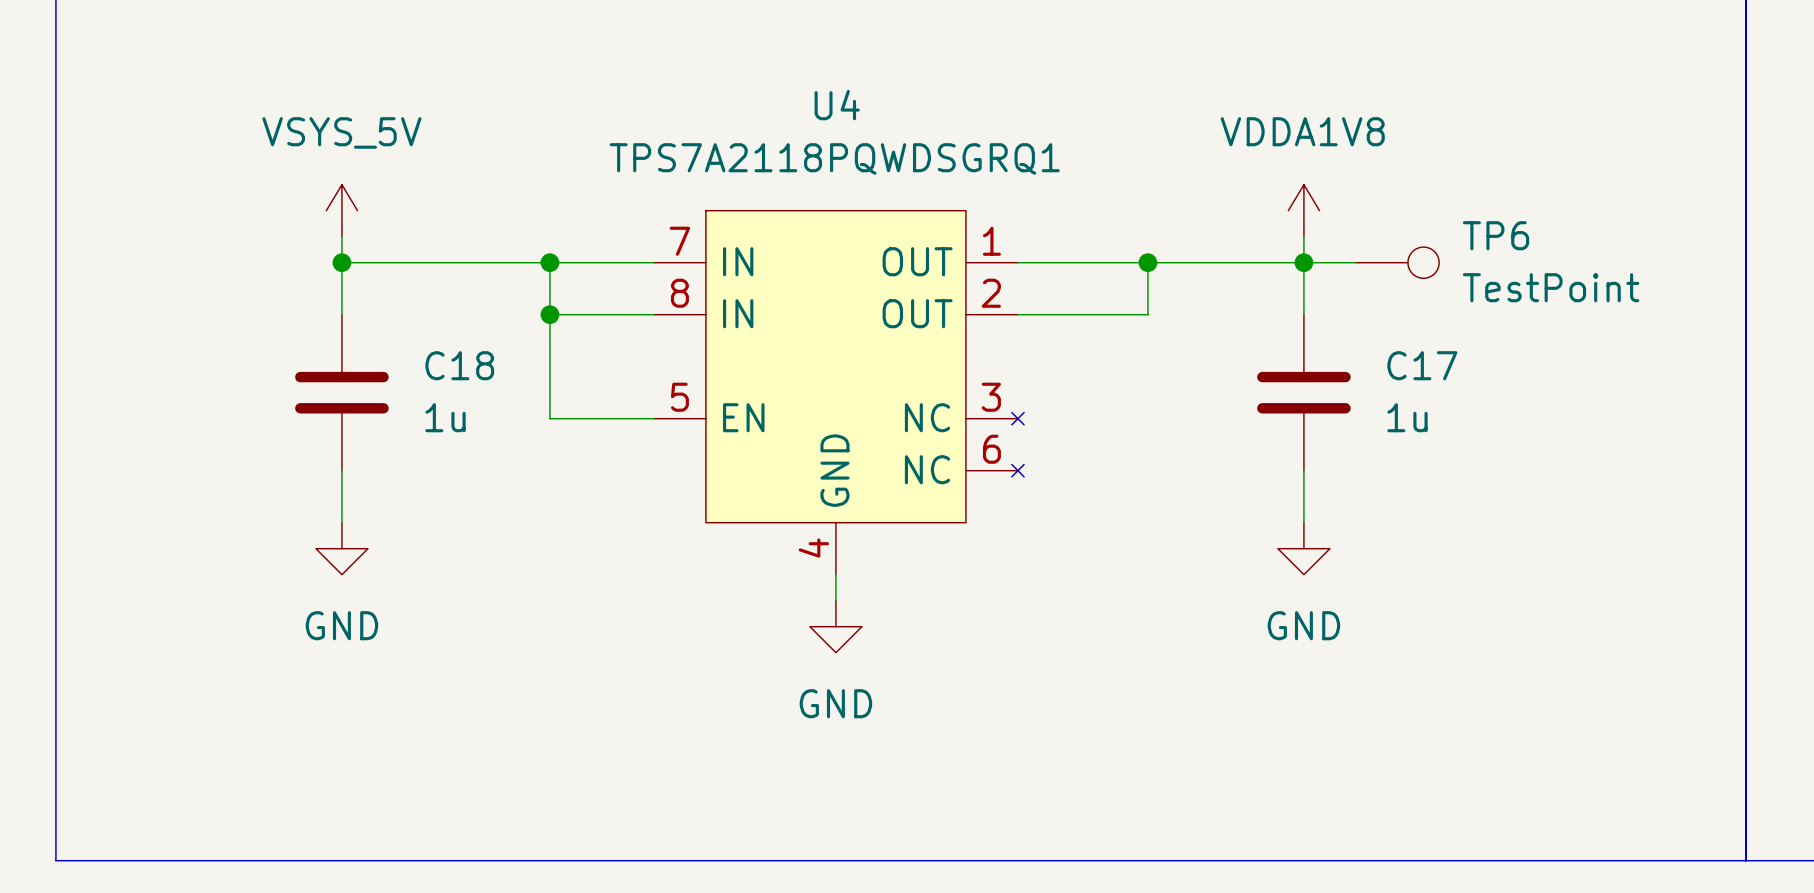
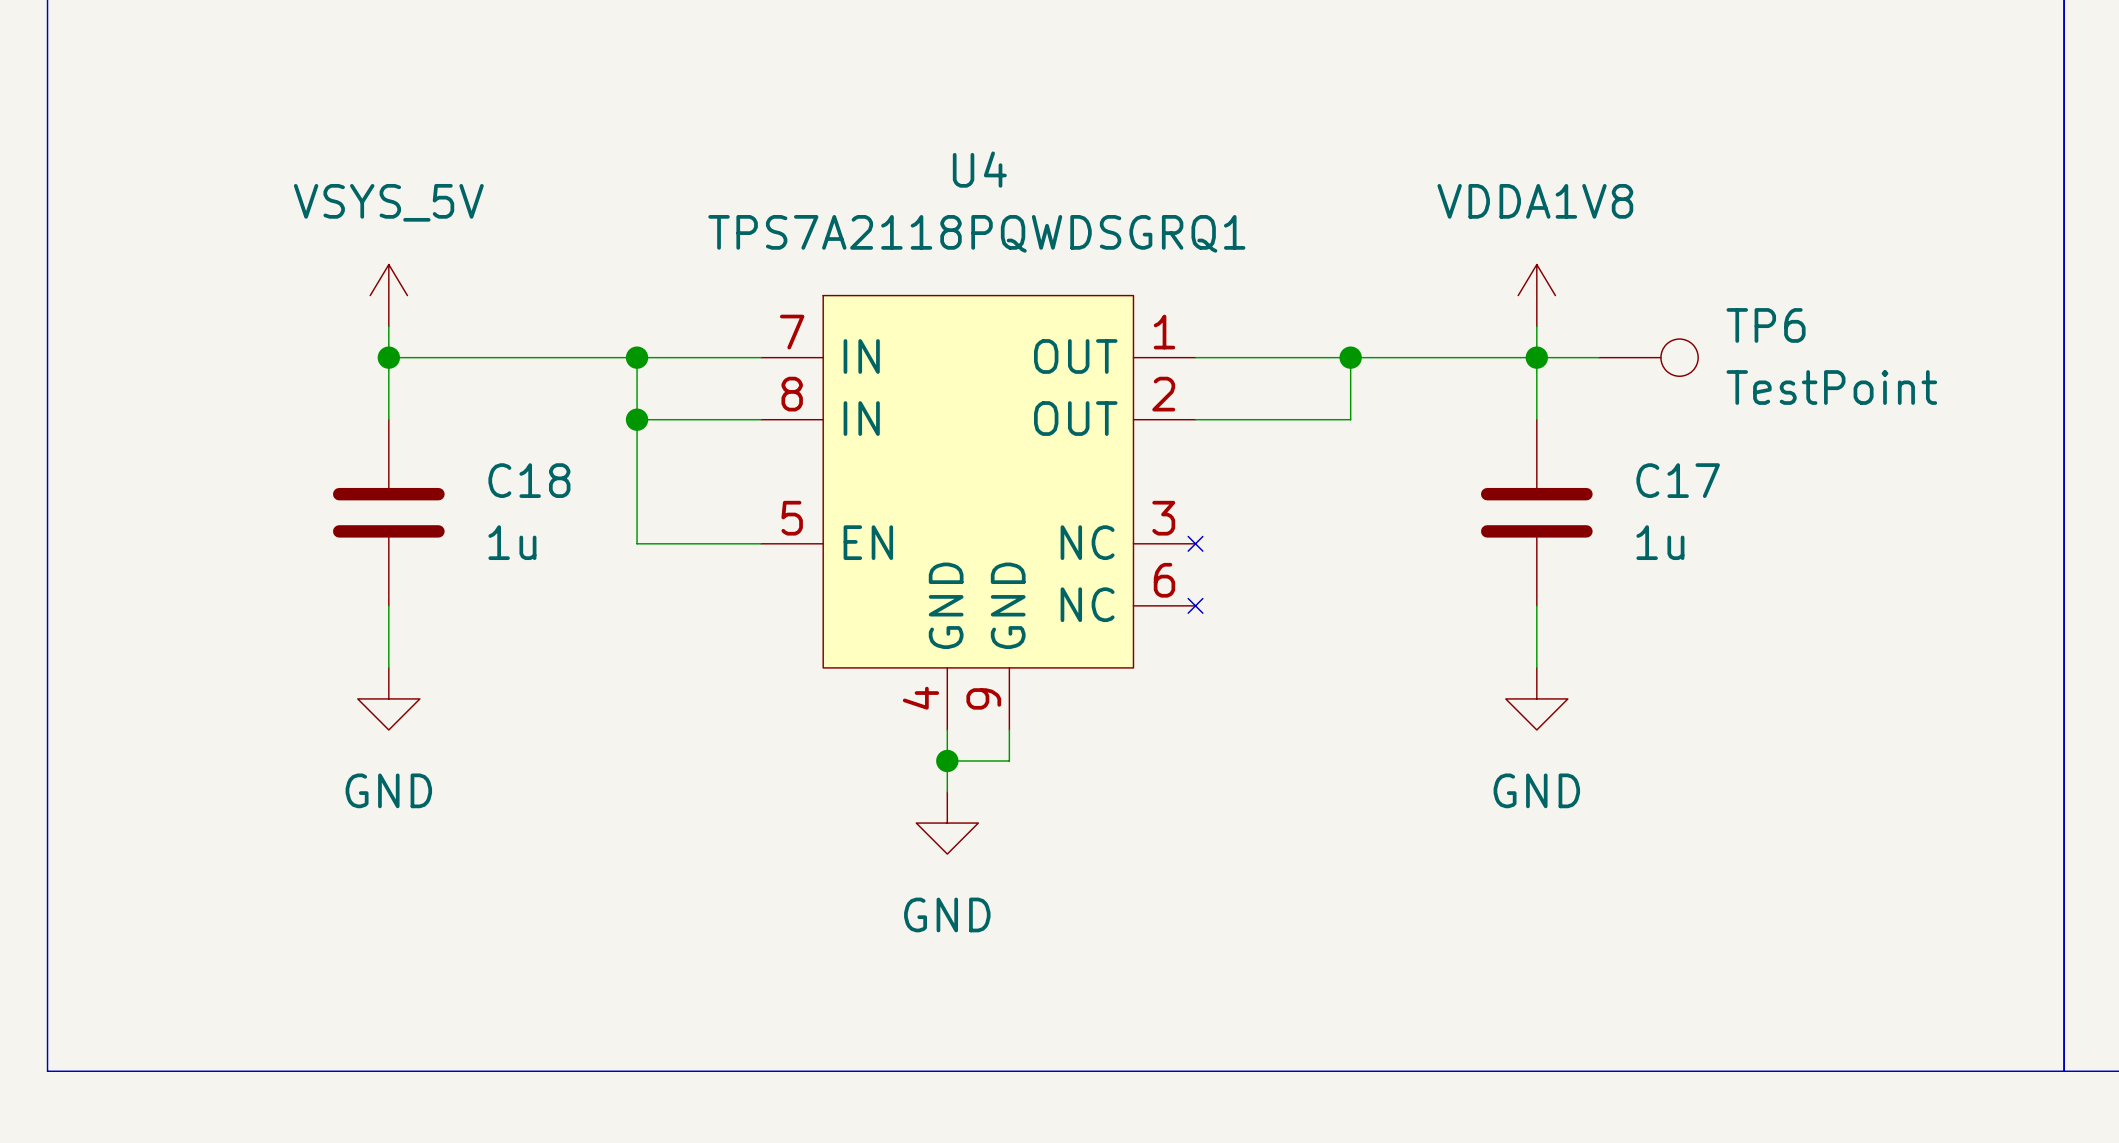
U4 symbol: [653, 210, 1025, 575] -> [761, 295, 1203, 730]
wire: none -> (947, 729) (947, 792)
wire: (835, 574) (835, 600) -> none
wire: none -> (1009, 729) (1009, 760) (947, 760)
junction: none -> (947, 760)
power symbol position: GND (835, 626) -> GND (947, 823)

